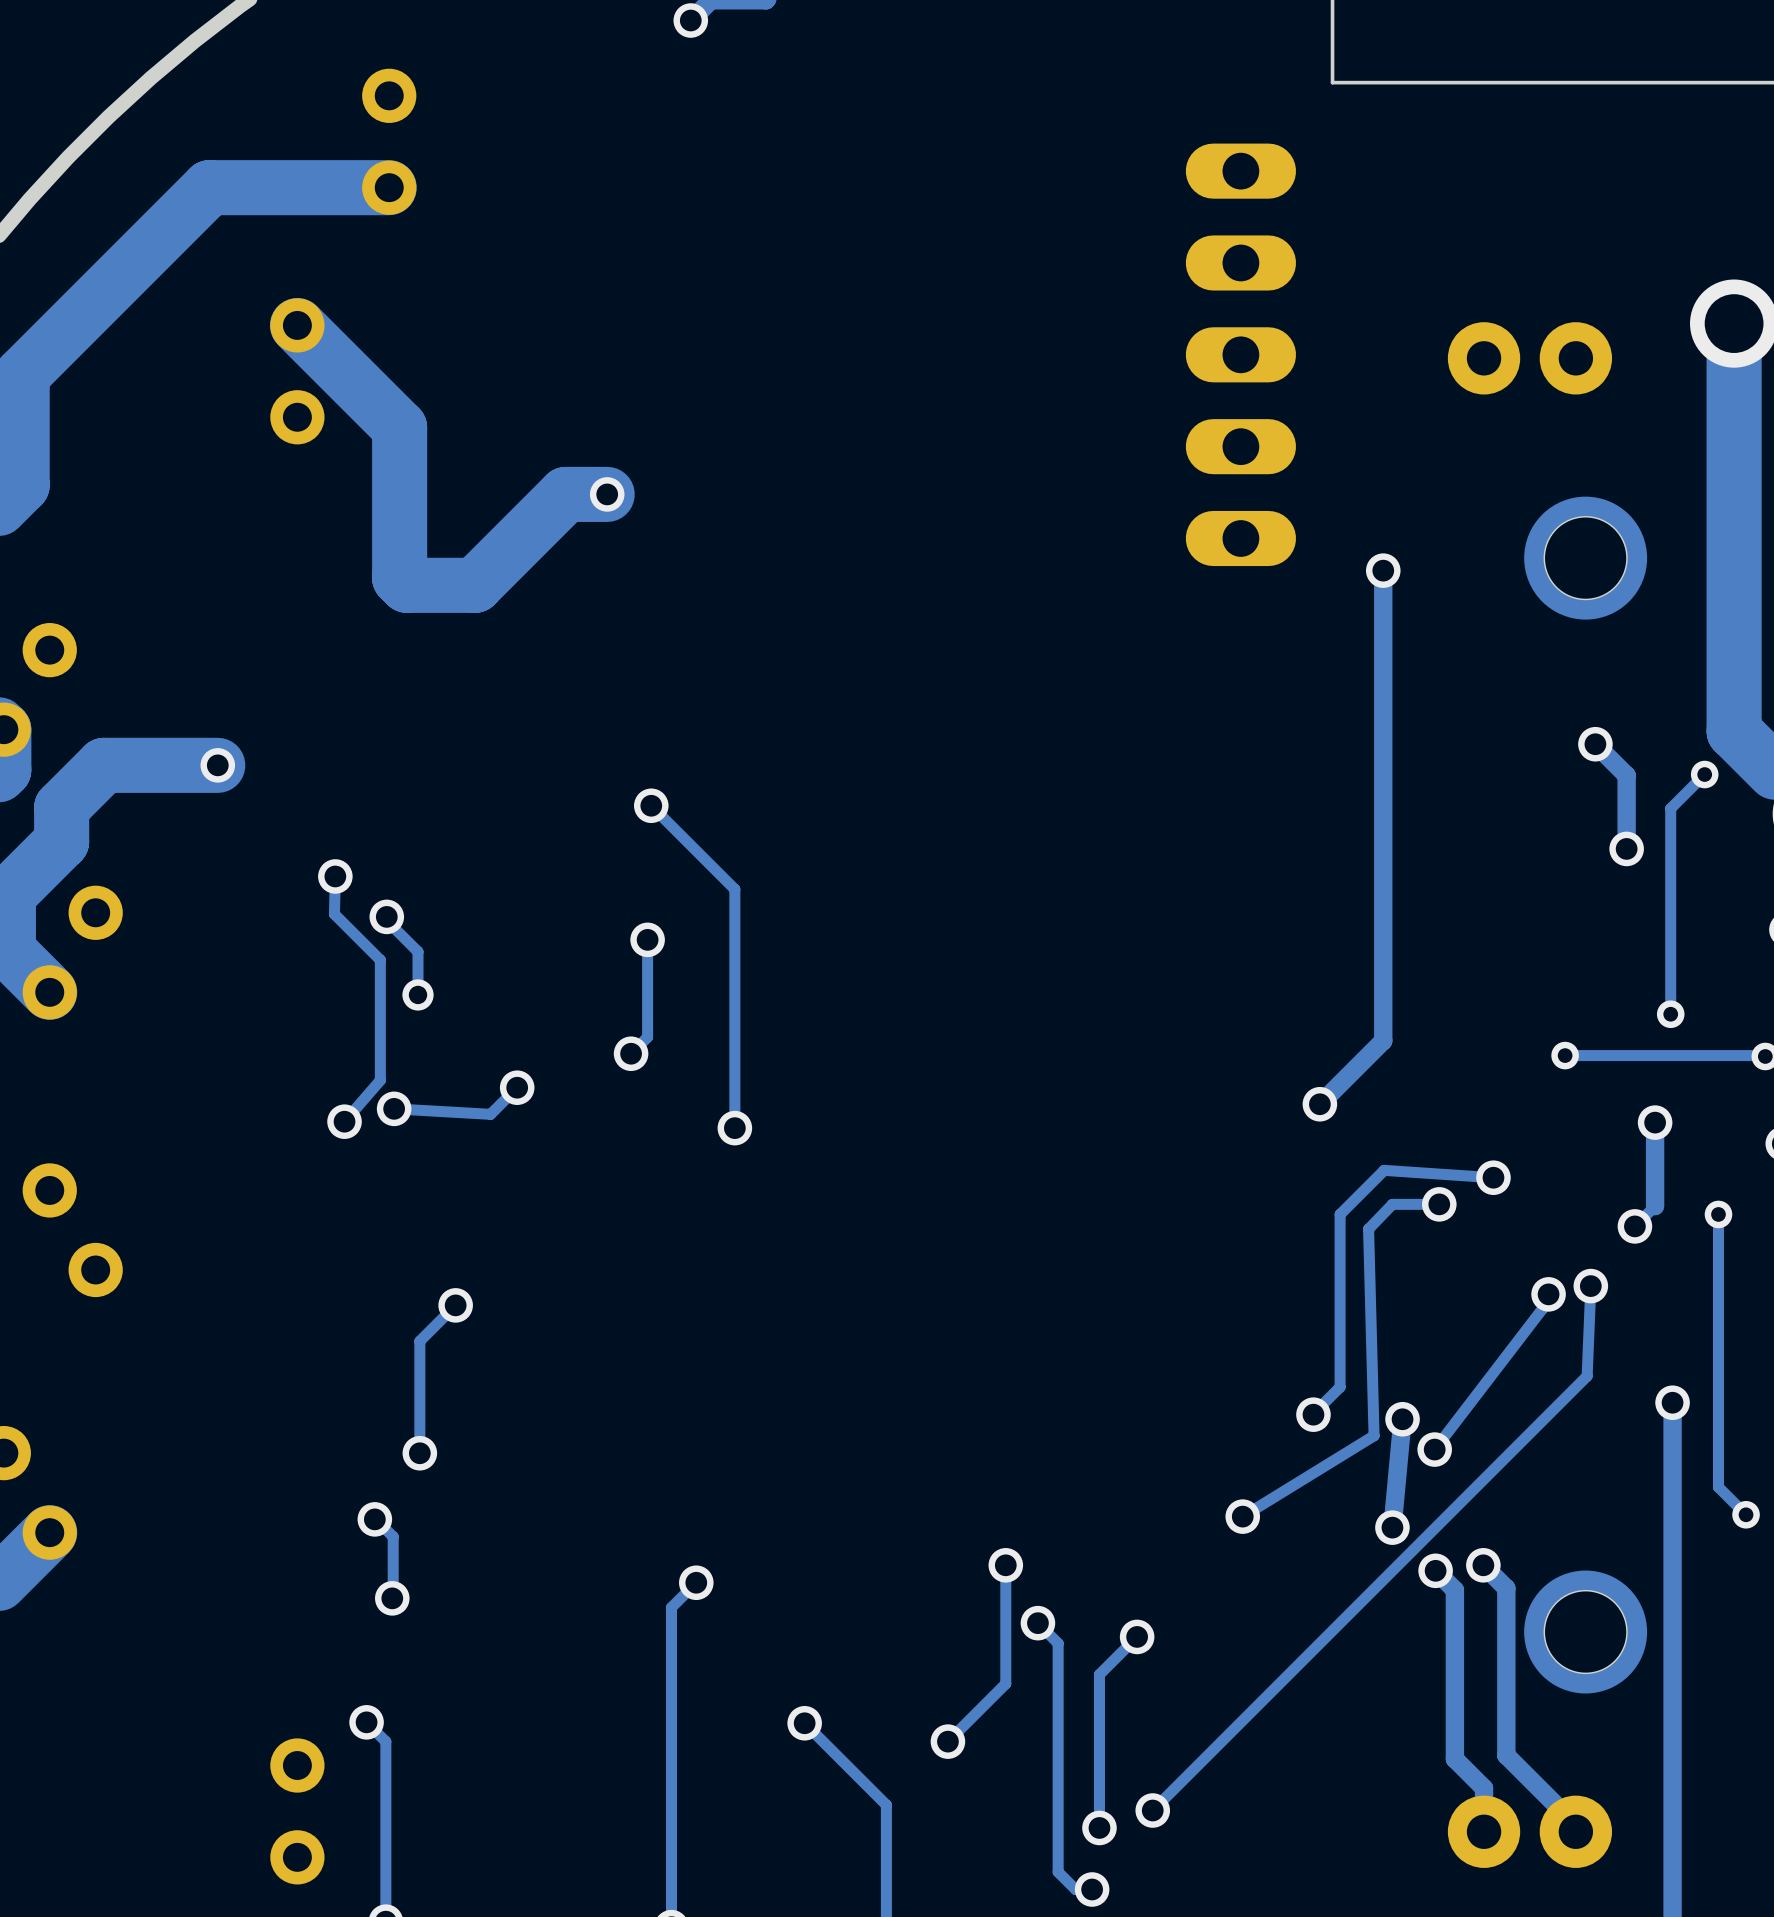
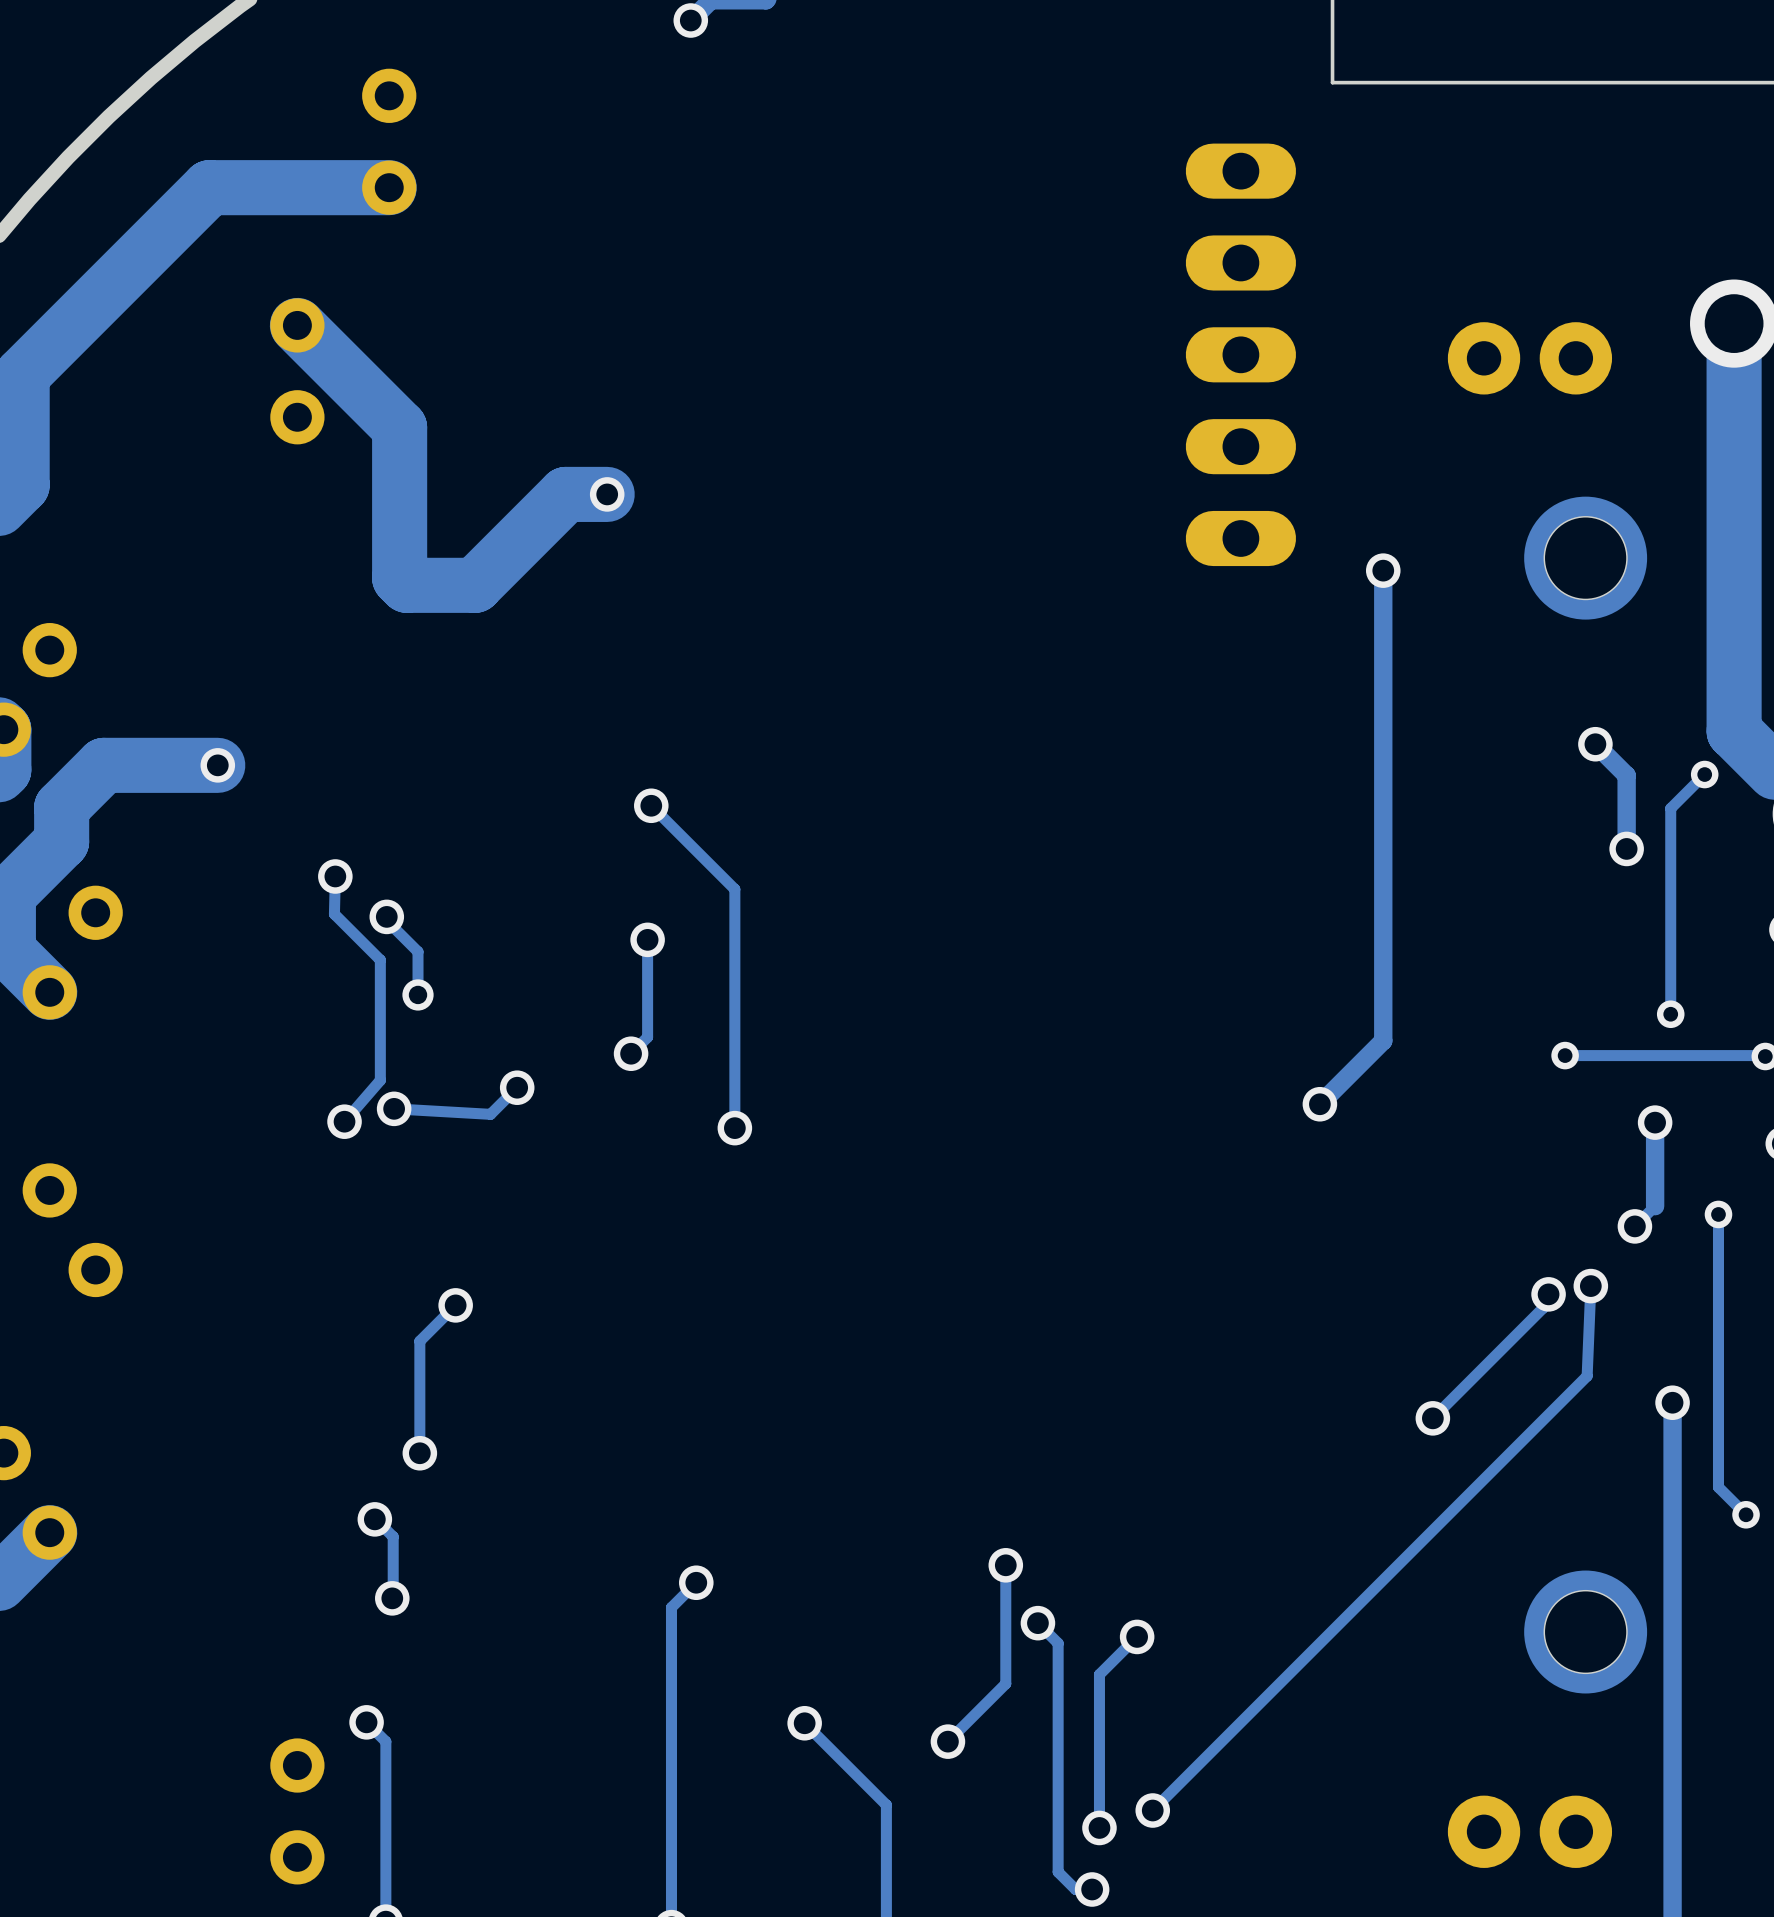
track: (1493, 1177) (1384, 1170) (1340, 1214) (1340, 1387) (1313, 1414) -> none
via: (1493, 1177) -> none
track: (1439, 1204) (1392, 1204) (1368, 1229) (1374, 1435) (1242, 1516) -> none
via: (1439, 1204) -> none
track: (1543, 1308) (1434, 1449) -> (1543, 1308) (1432, 1418)
via: (1313, 1414) -> none
via: none -> (1432, 1418)
track: (1402, 1419) (1392, 1527) -> none
via: (1402, 1419) -> none
via: (1434, 1449) -> none
via: (1242, 1516) -> none
via: (1392, 1527) -> none
track: (1483, 1565) (1506, 1588) (1506, 1755) (1575, 1824) -> none
via: (1483, 1565) -> none
track: (1435, 1570) (1454, 1590) (1454, 1759) (1484, 1788) (1484, 1831) -> none
via: (1435, 1570) -> none

